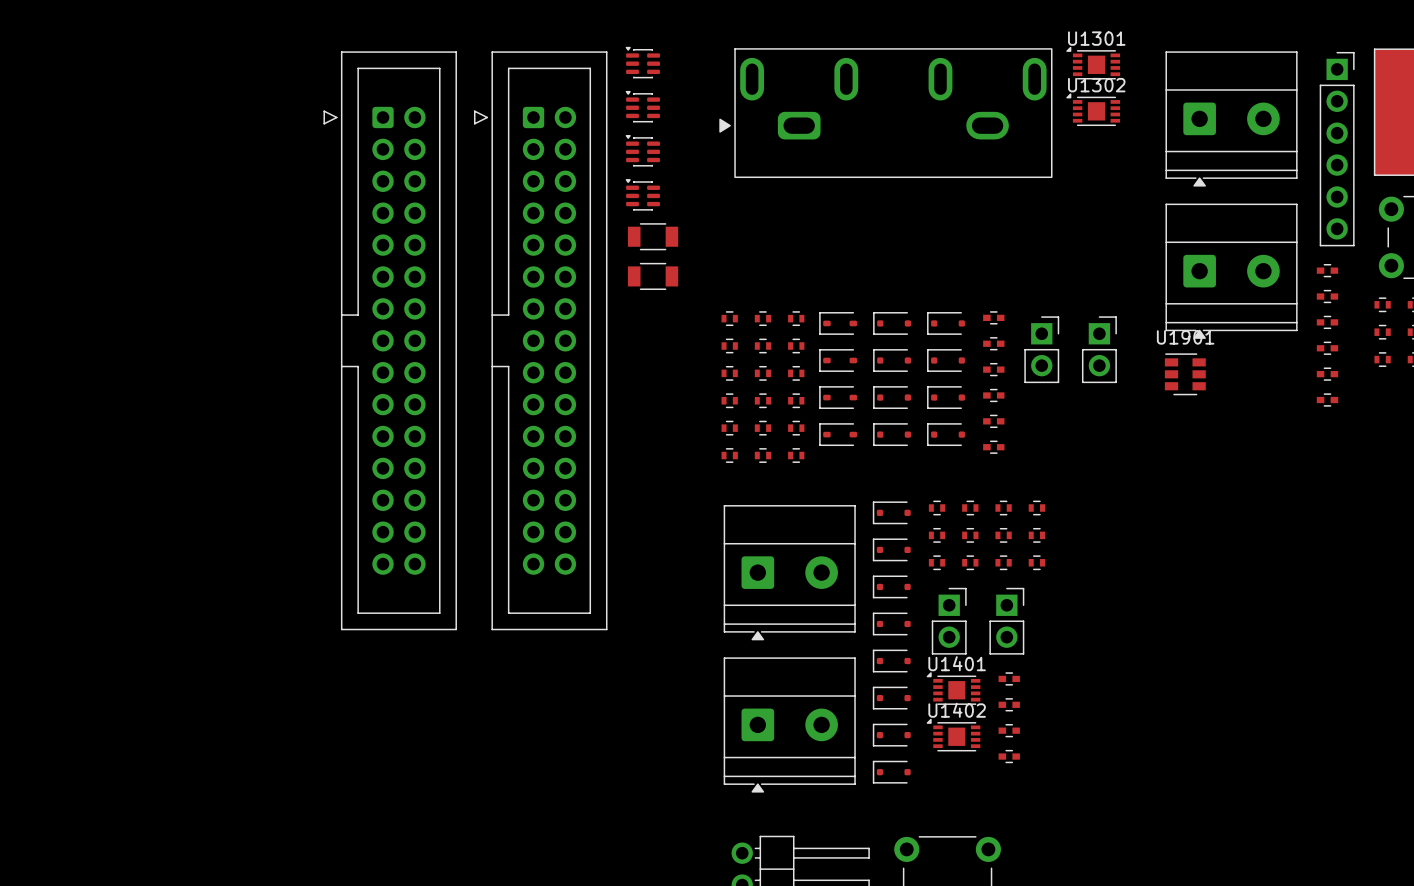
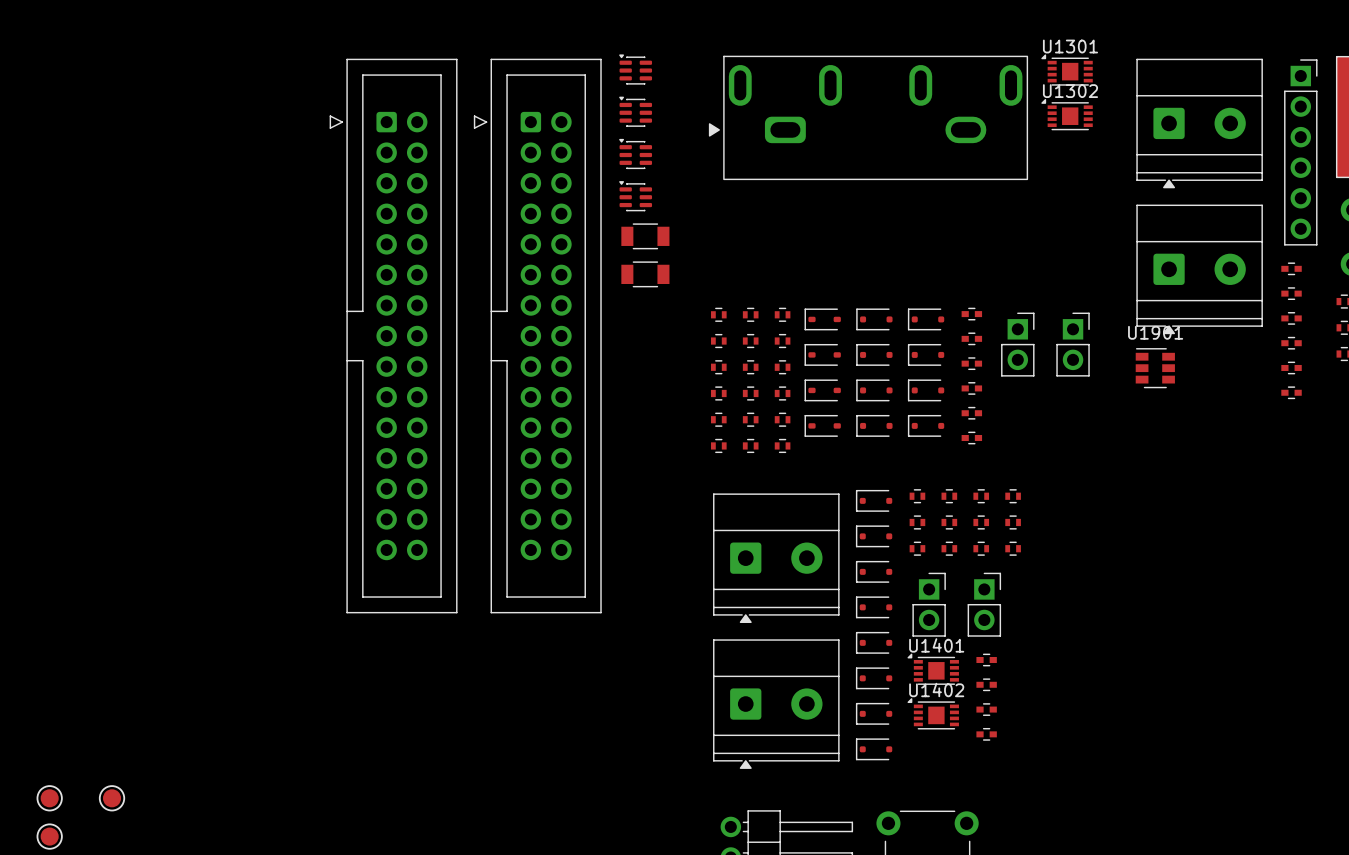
part: none -> (49, 798)
part: none -> (112, 798)
part: none -> (49, 836)

